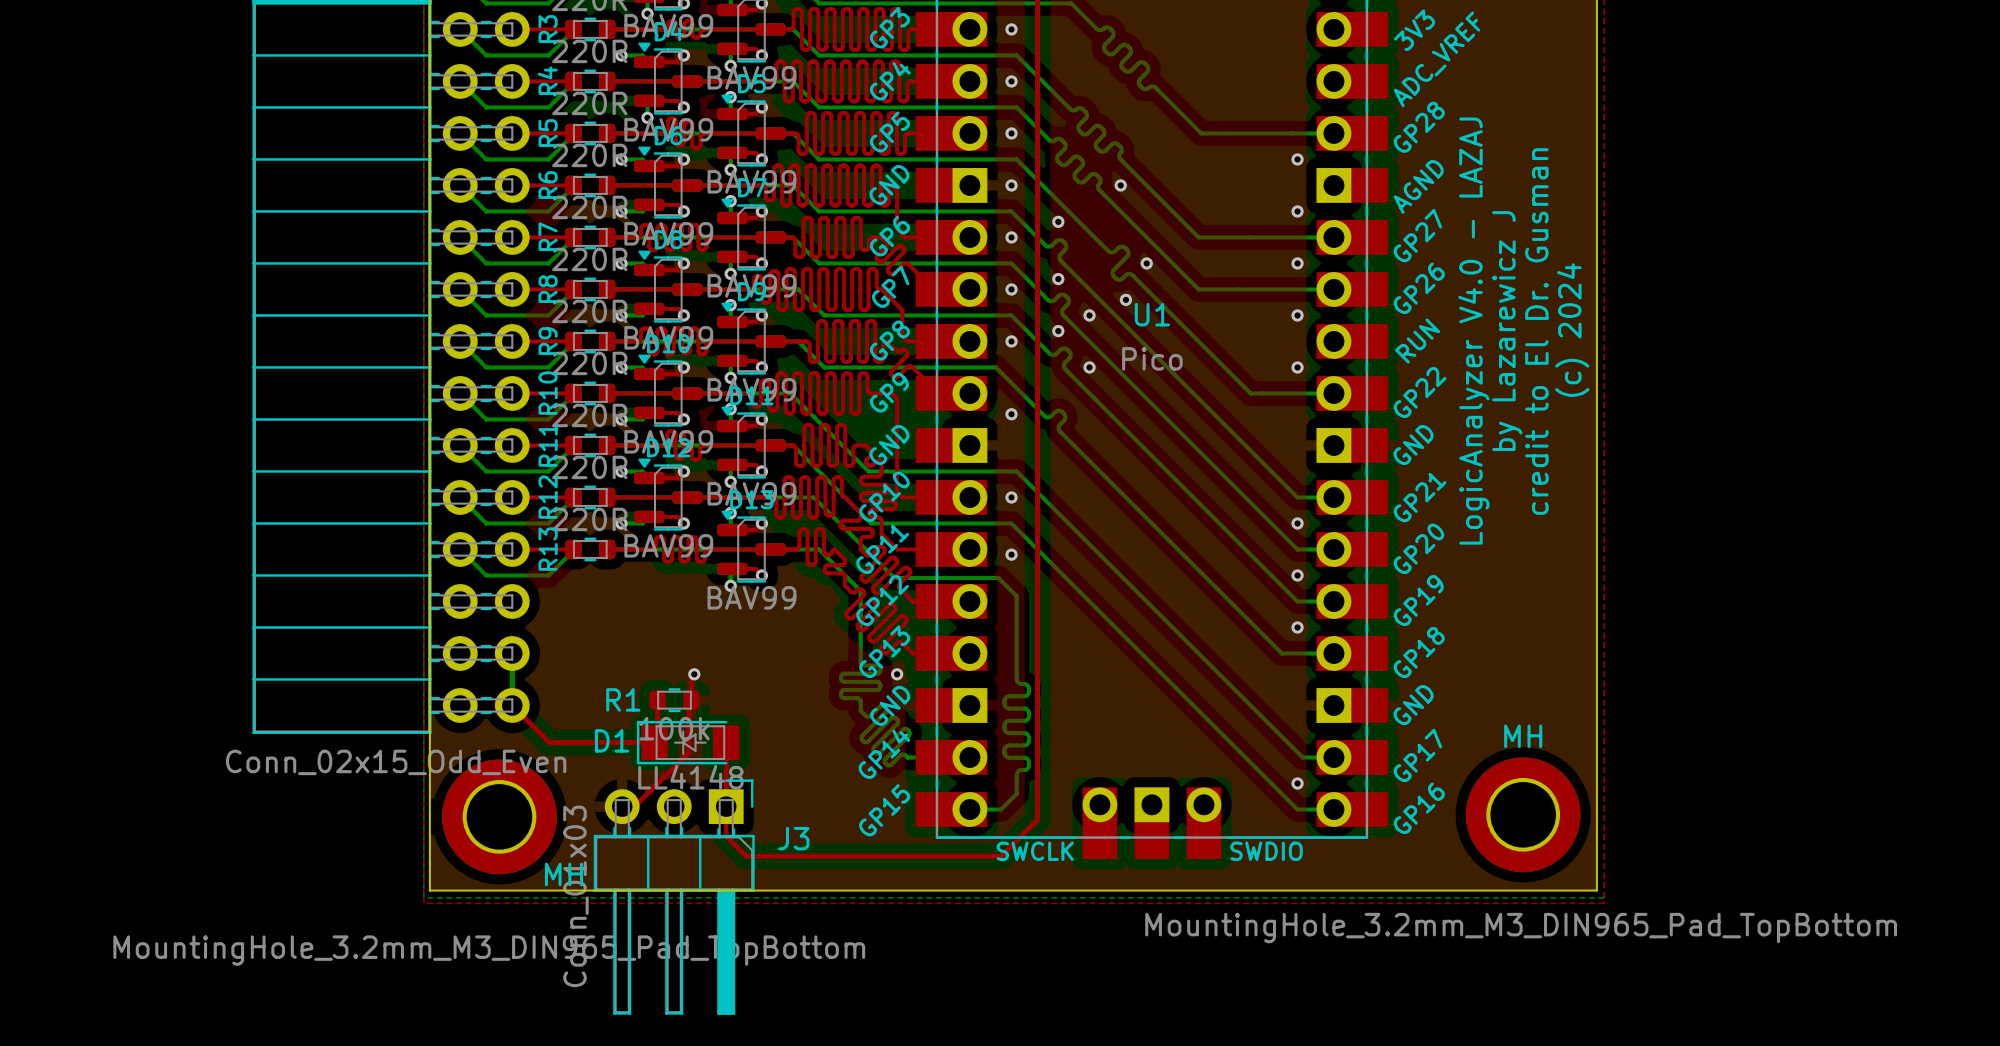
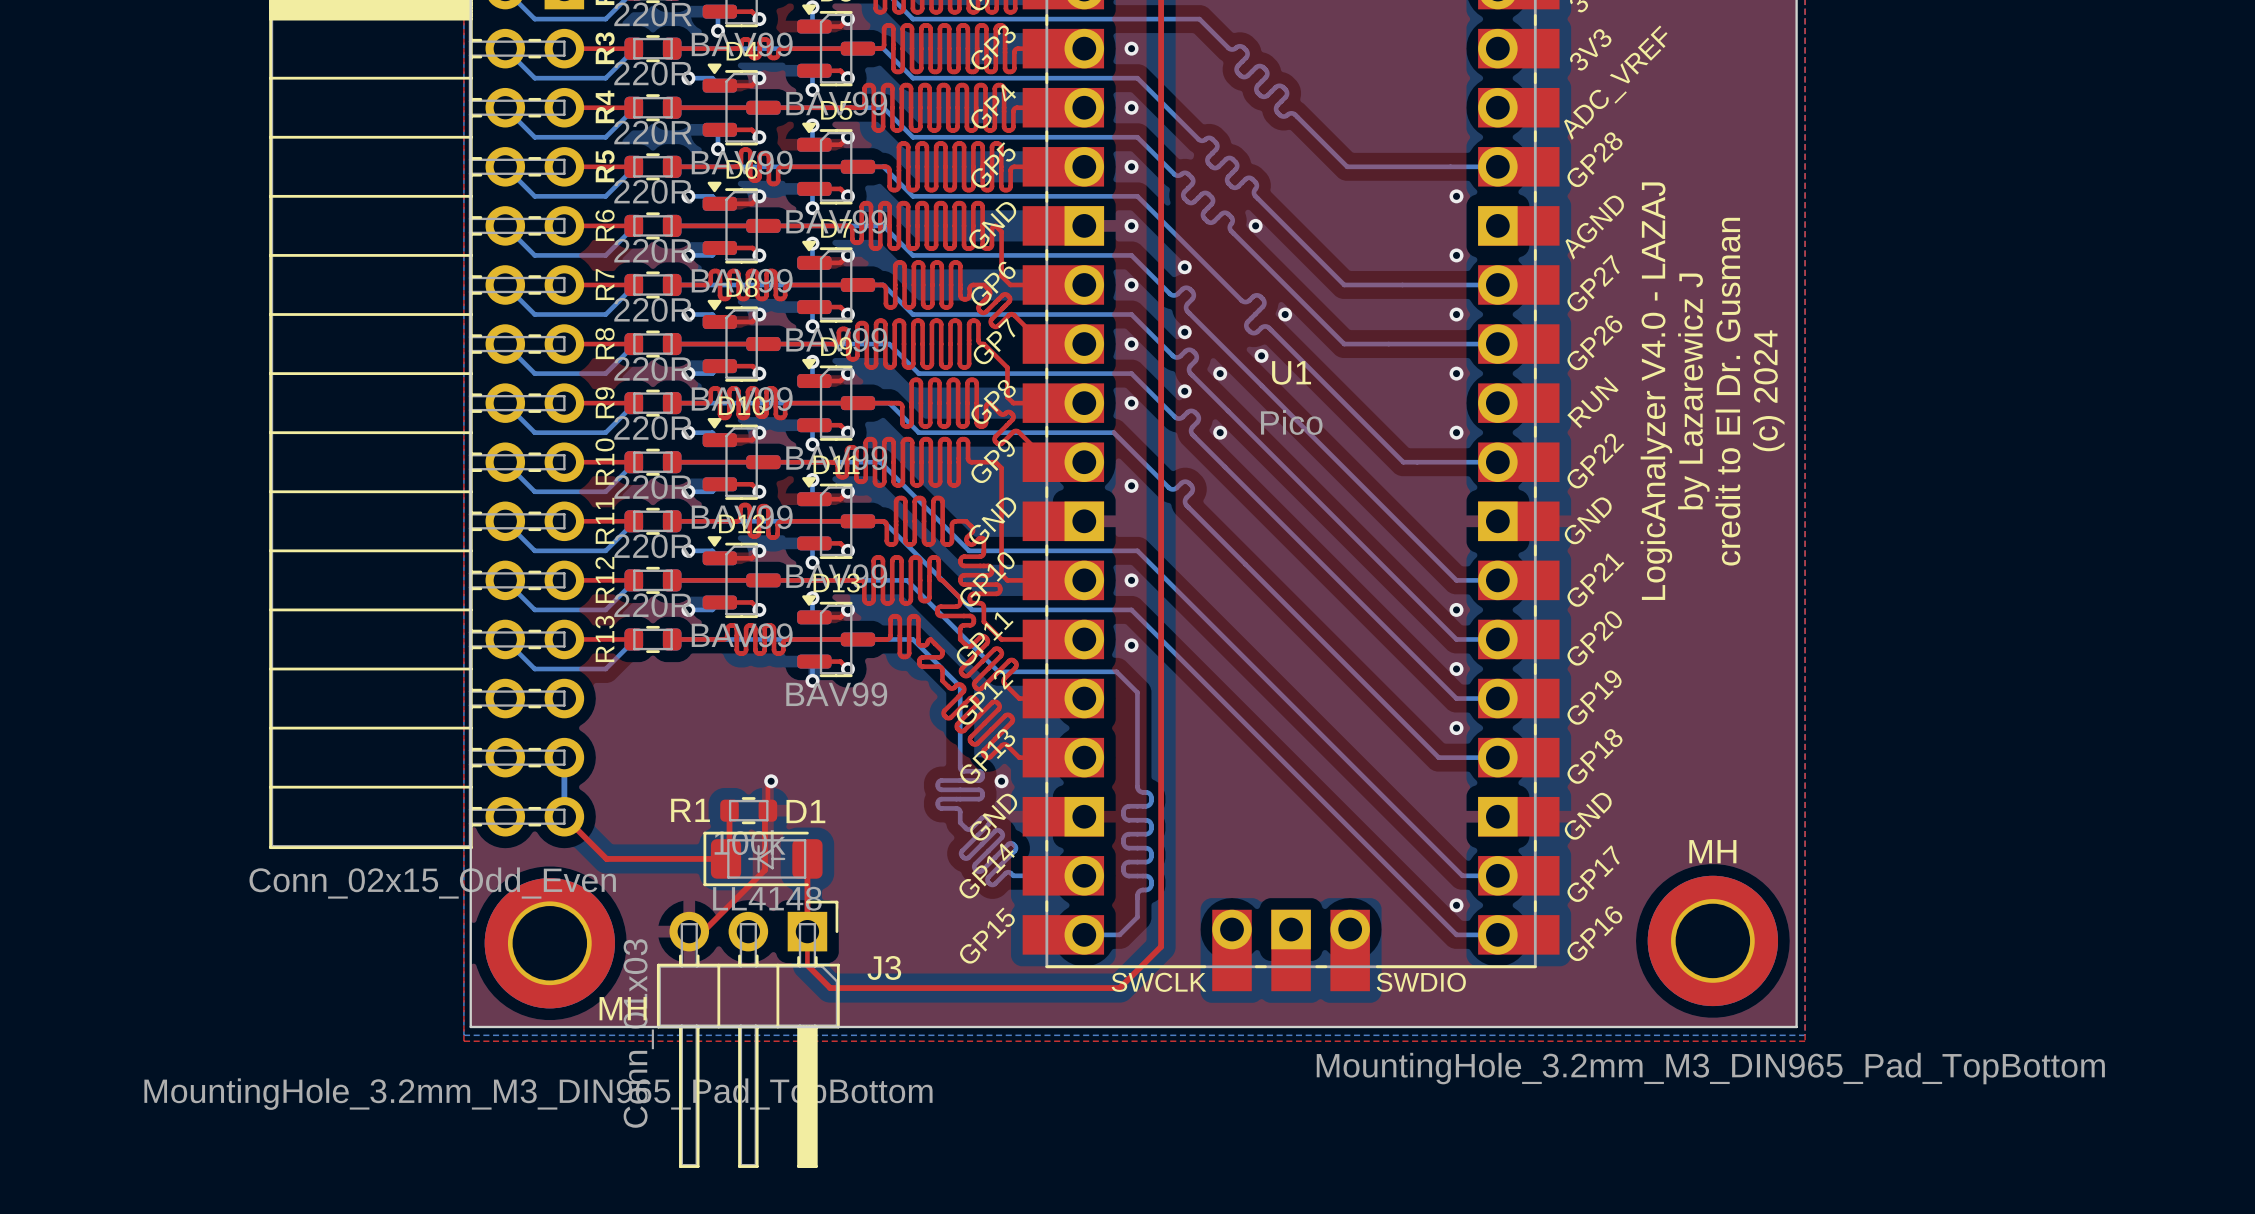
D1 footprint: [636, 720, 740, 765] -> [703, 831, 823, 887]
D1 name position: D1 (612, 740) -> D1 (805, 811)

